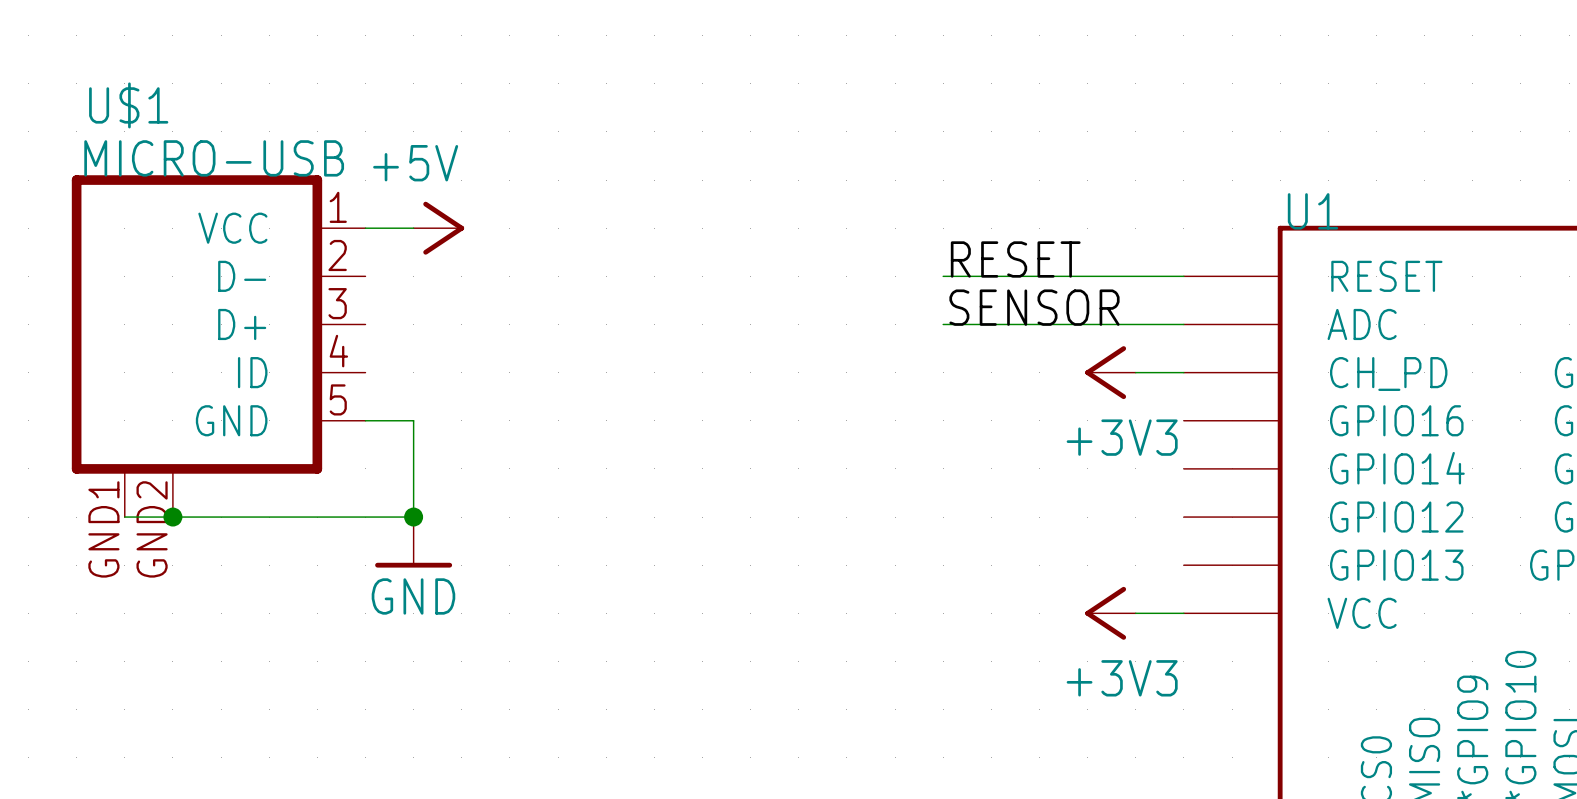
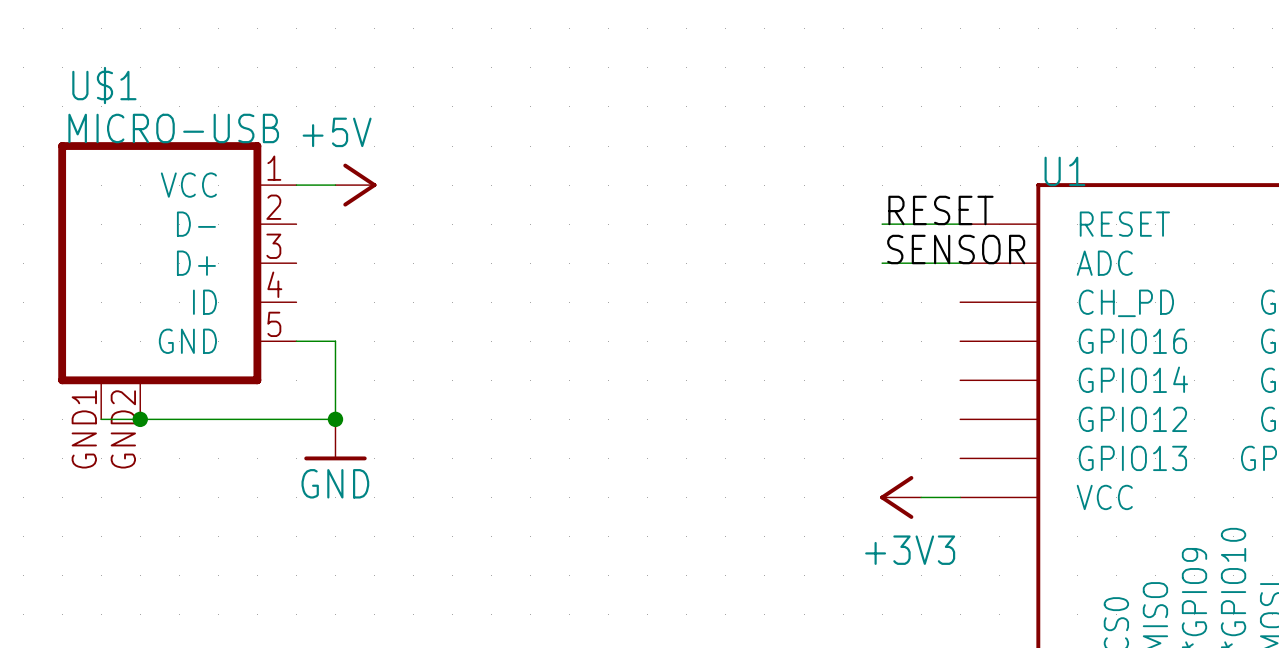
label position: RESET (1015, 259) -> RESET (940, 210)
wire: (943, 276) (1087, 276) -> none
label position: SENSOR (1034, 307) -> SENSOR (956, 249)
wire: (943, 324) (1087, 324) -> none
power symbol: +3V3 (1110, 372) -> none
wire: (1135, 372) (1183, 372) -> none

